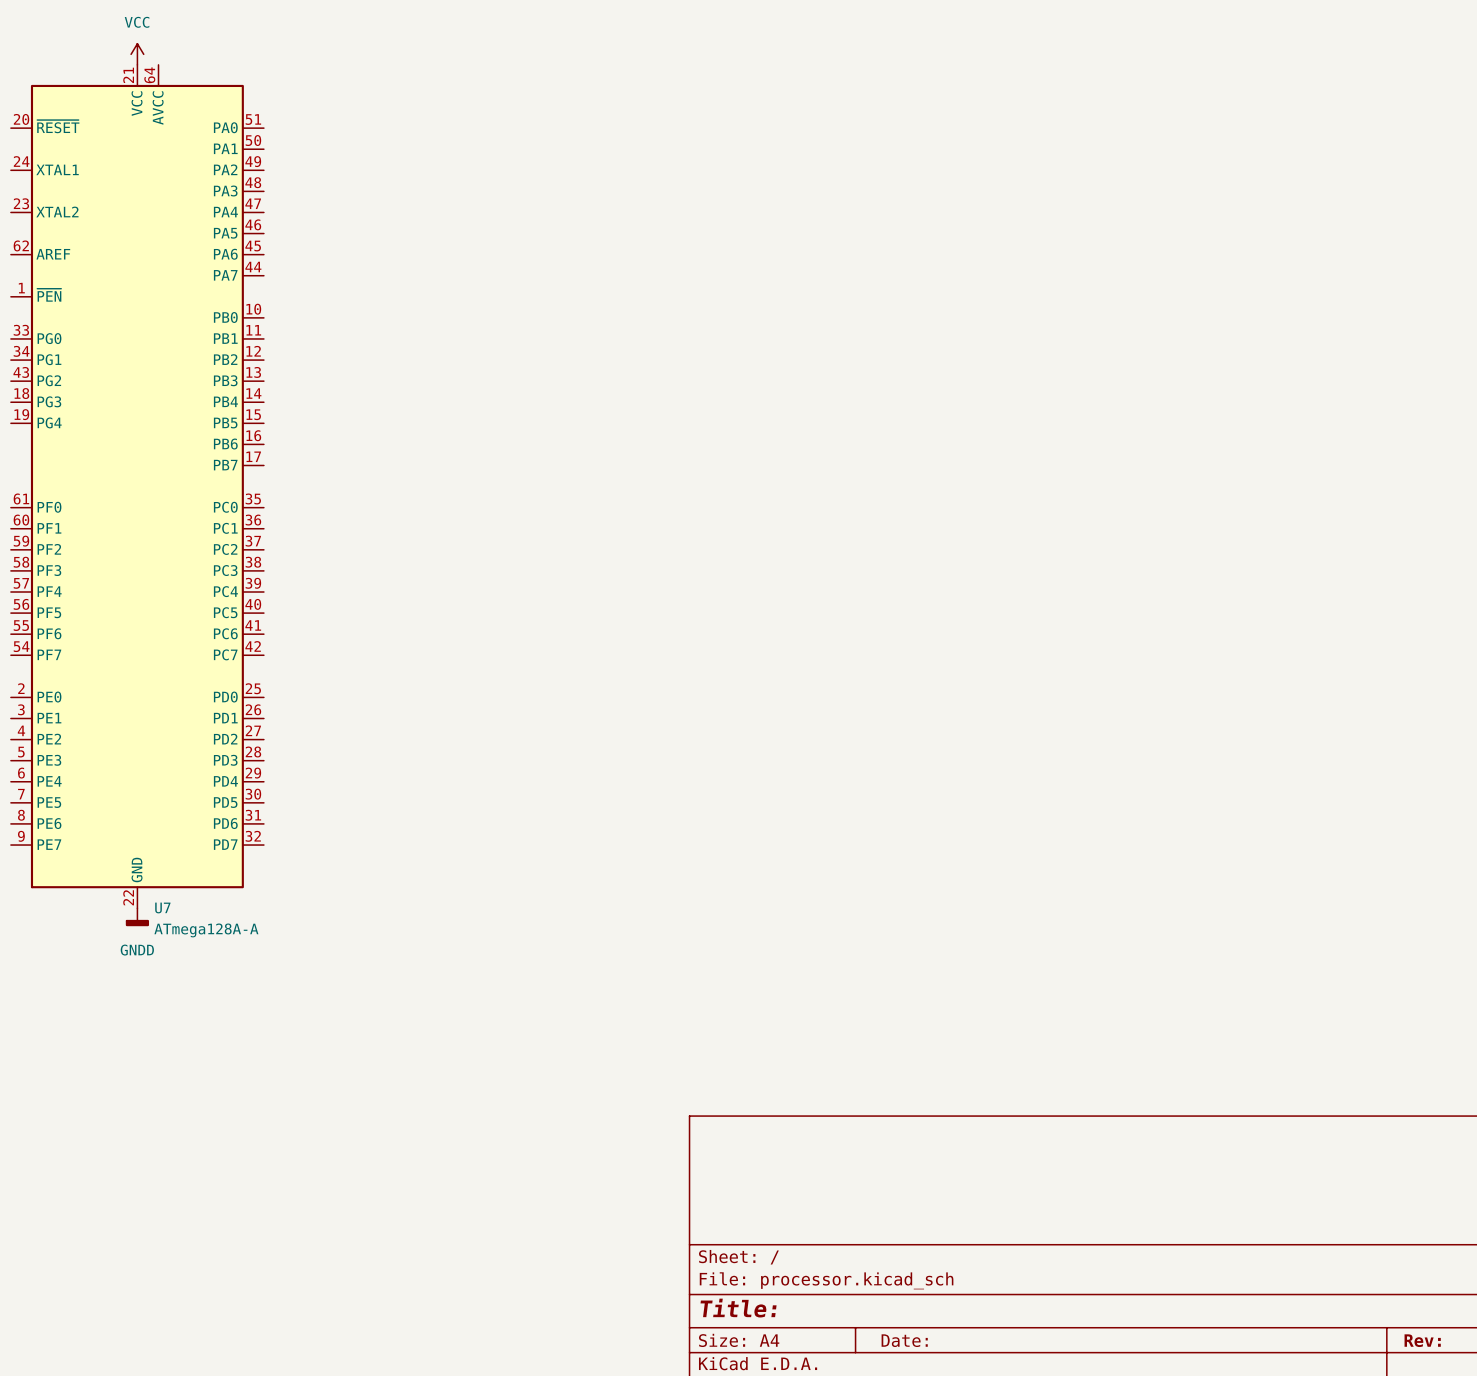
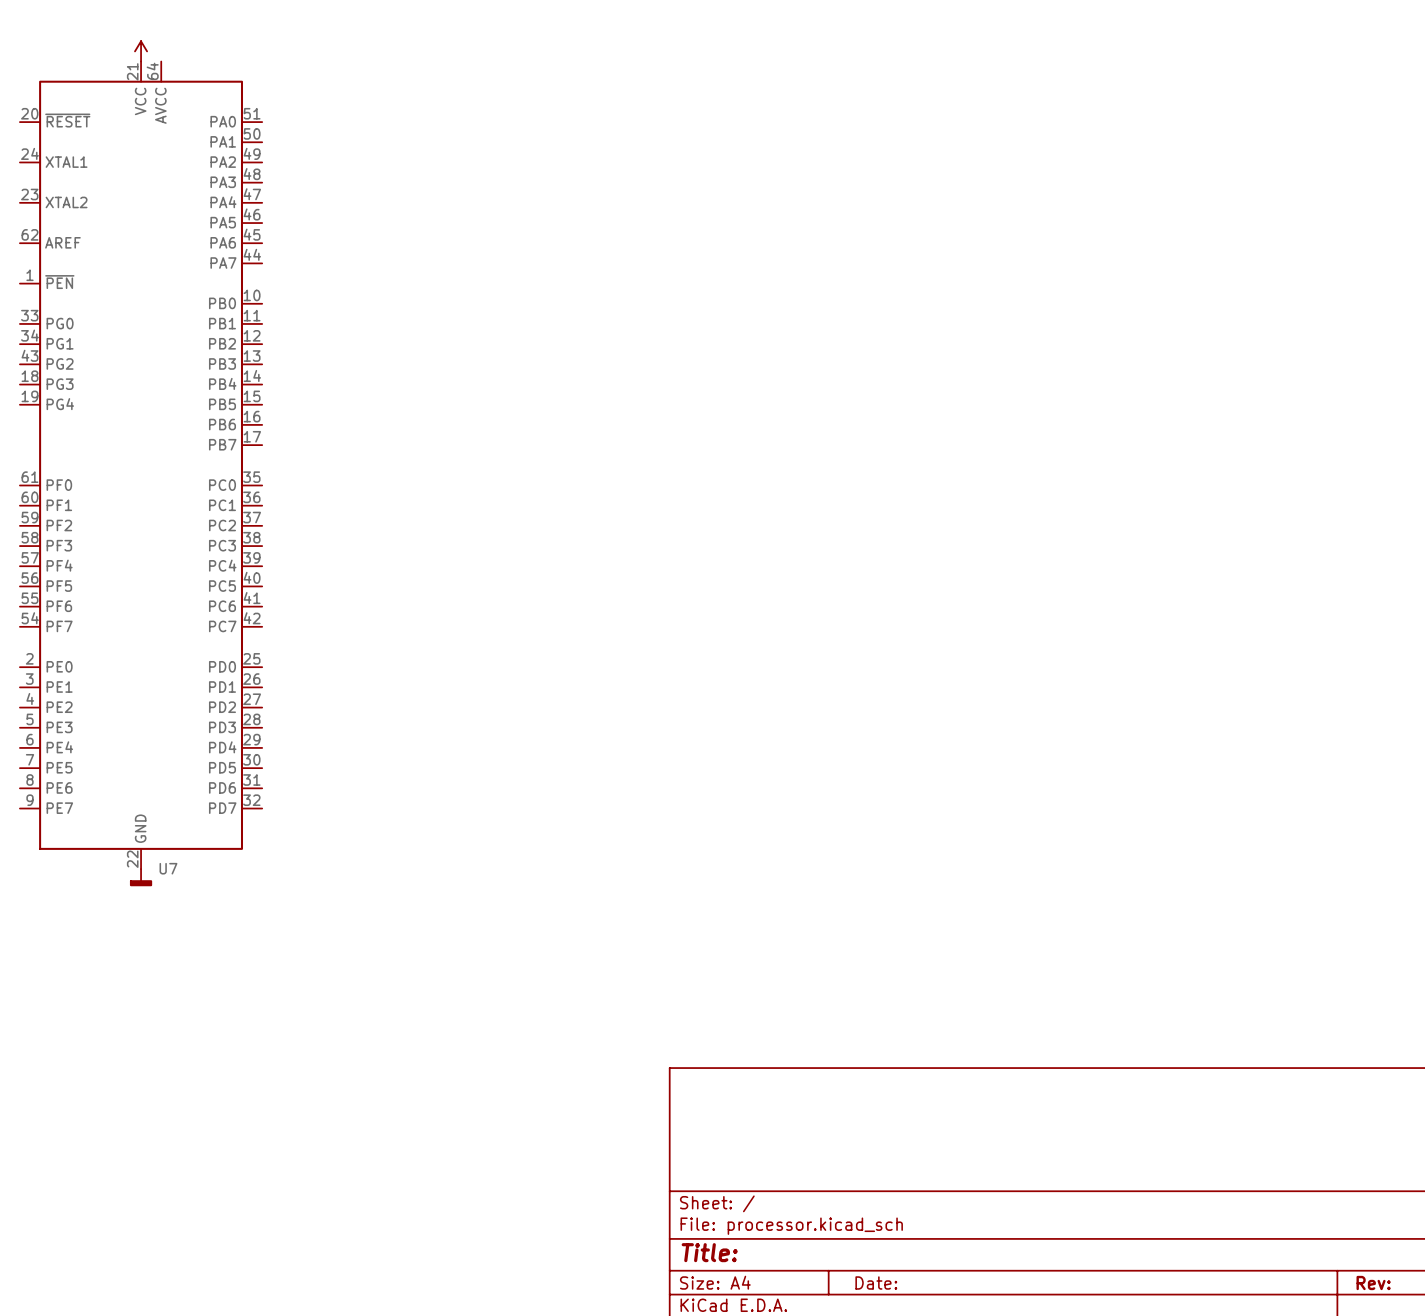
power symbol text: VCC (137, 22) -> none
U7 value: ATmega128A-A (206, 930) -> none
power symbol text: GNDD (137, 950) -> none

